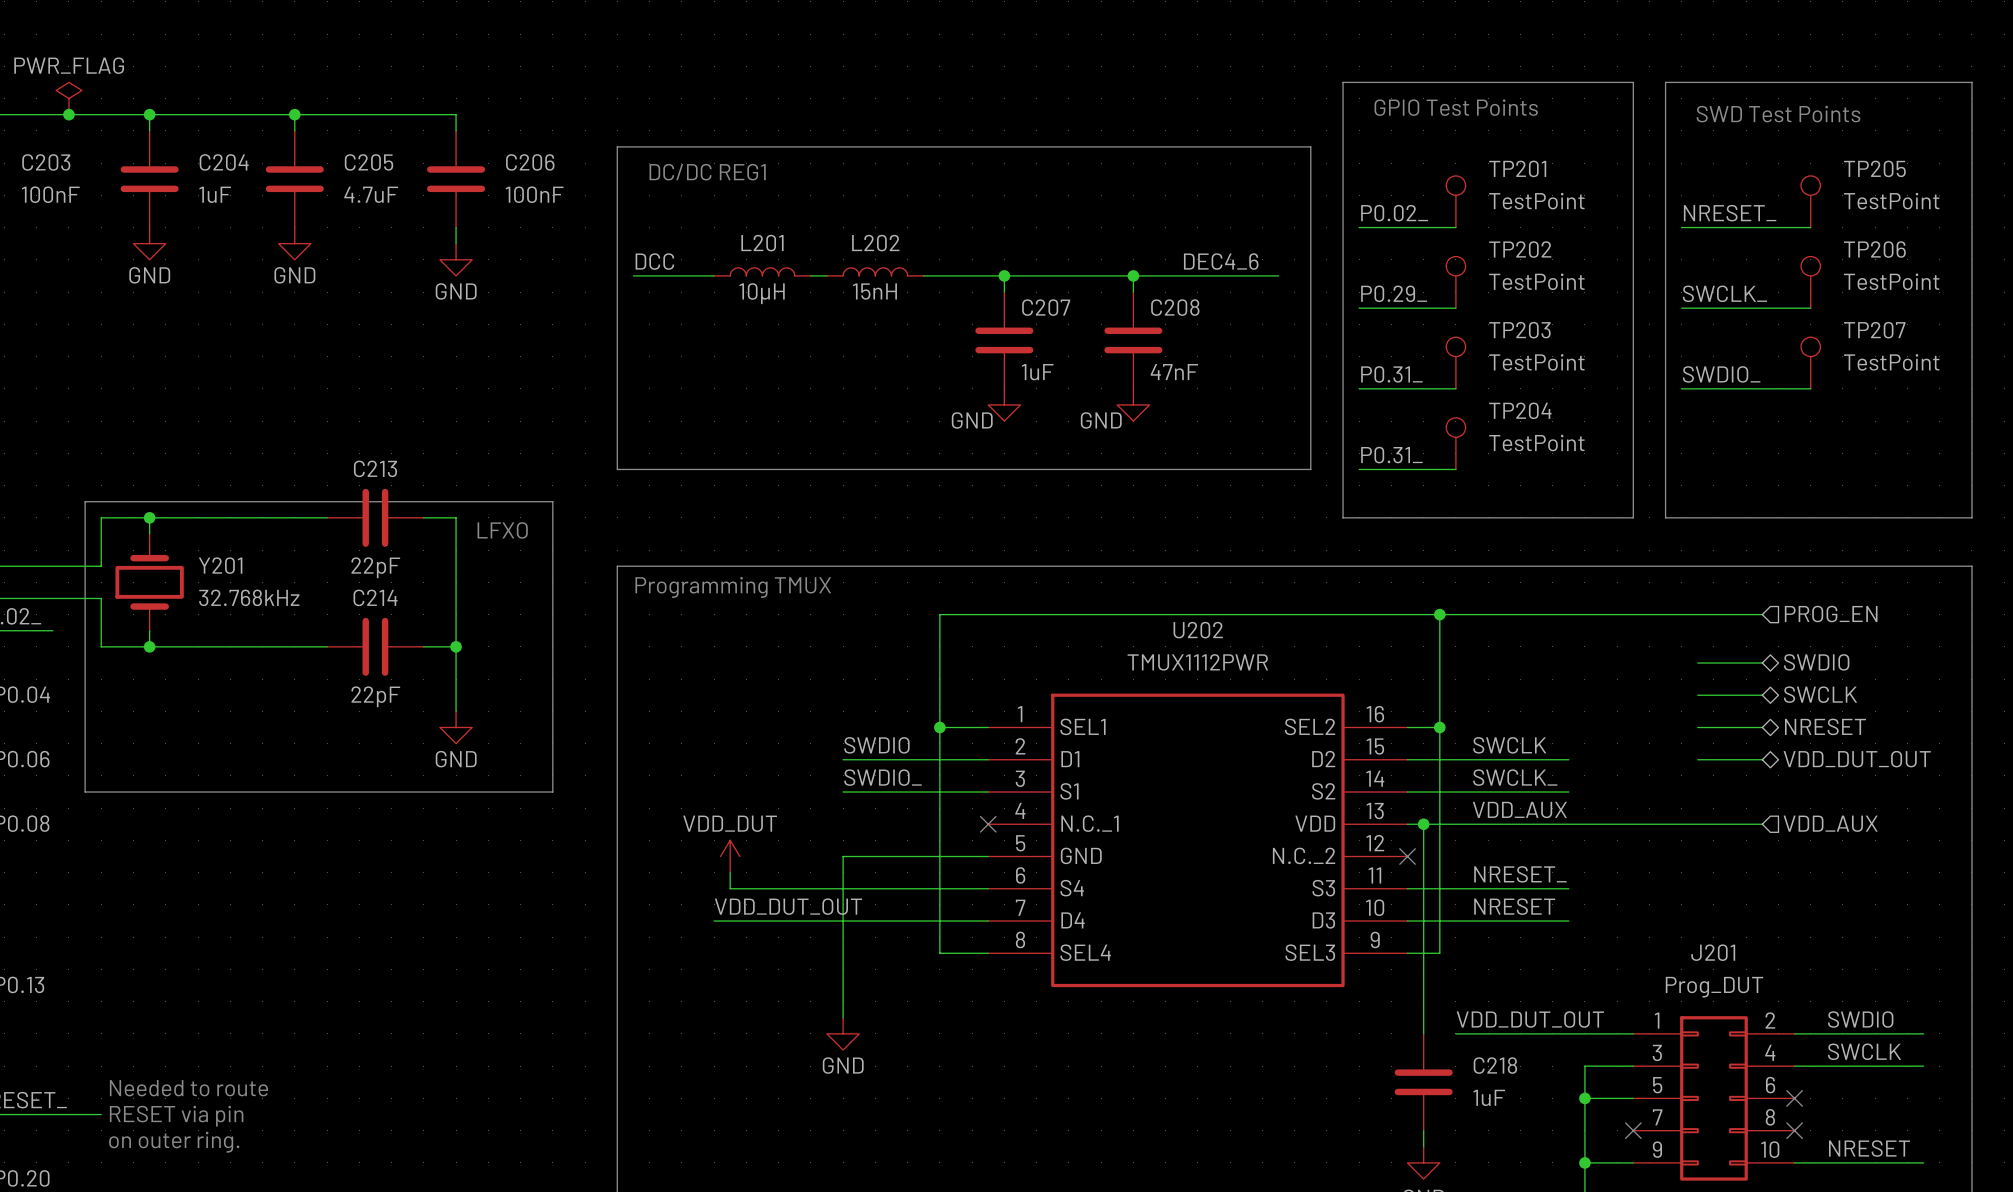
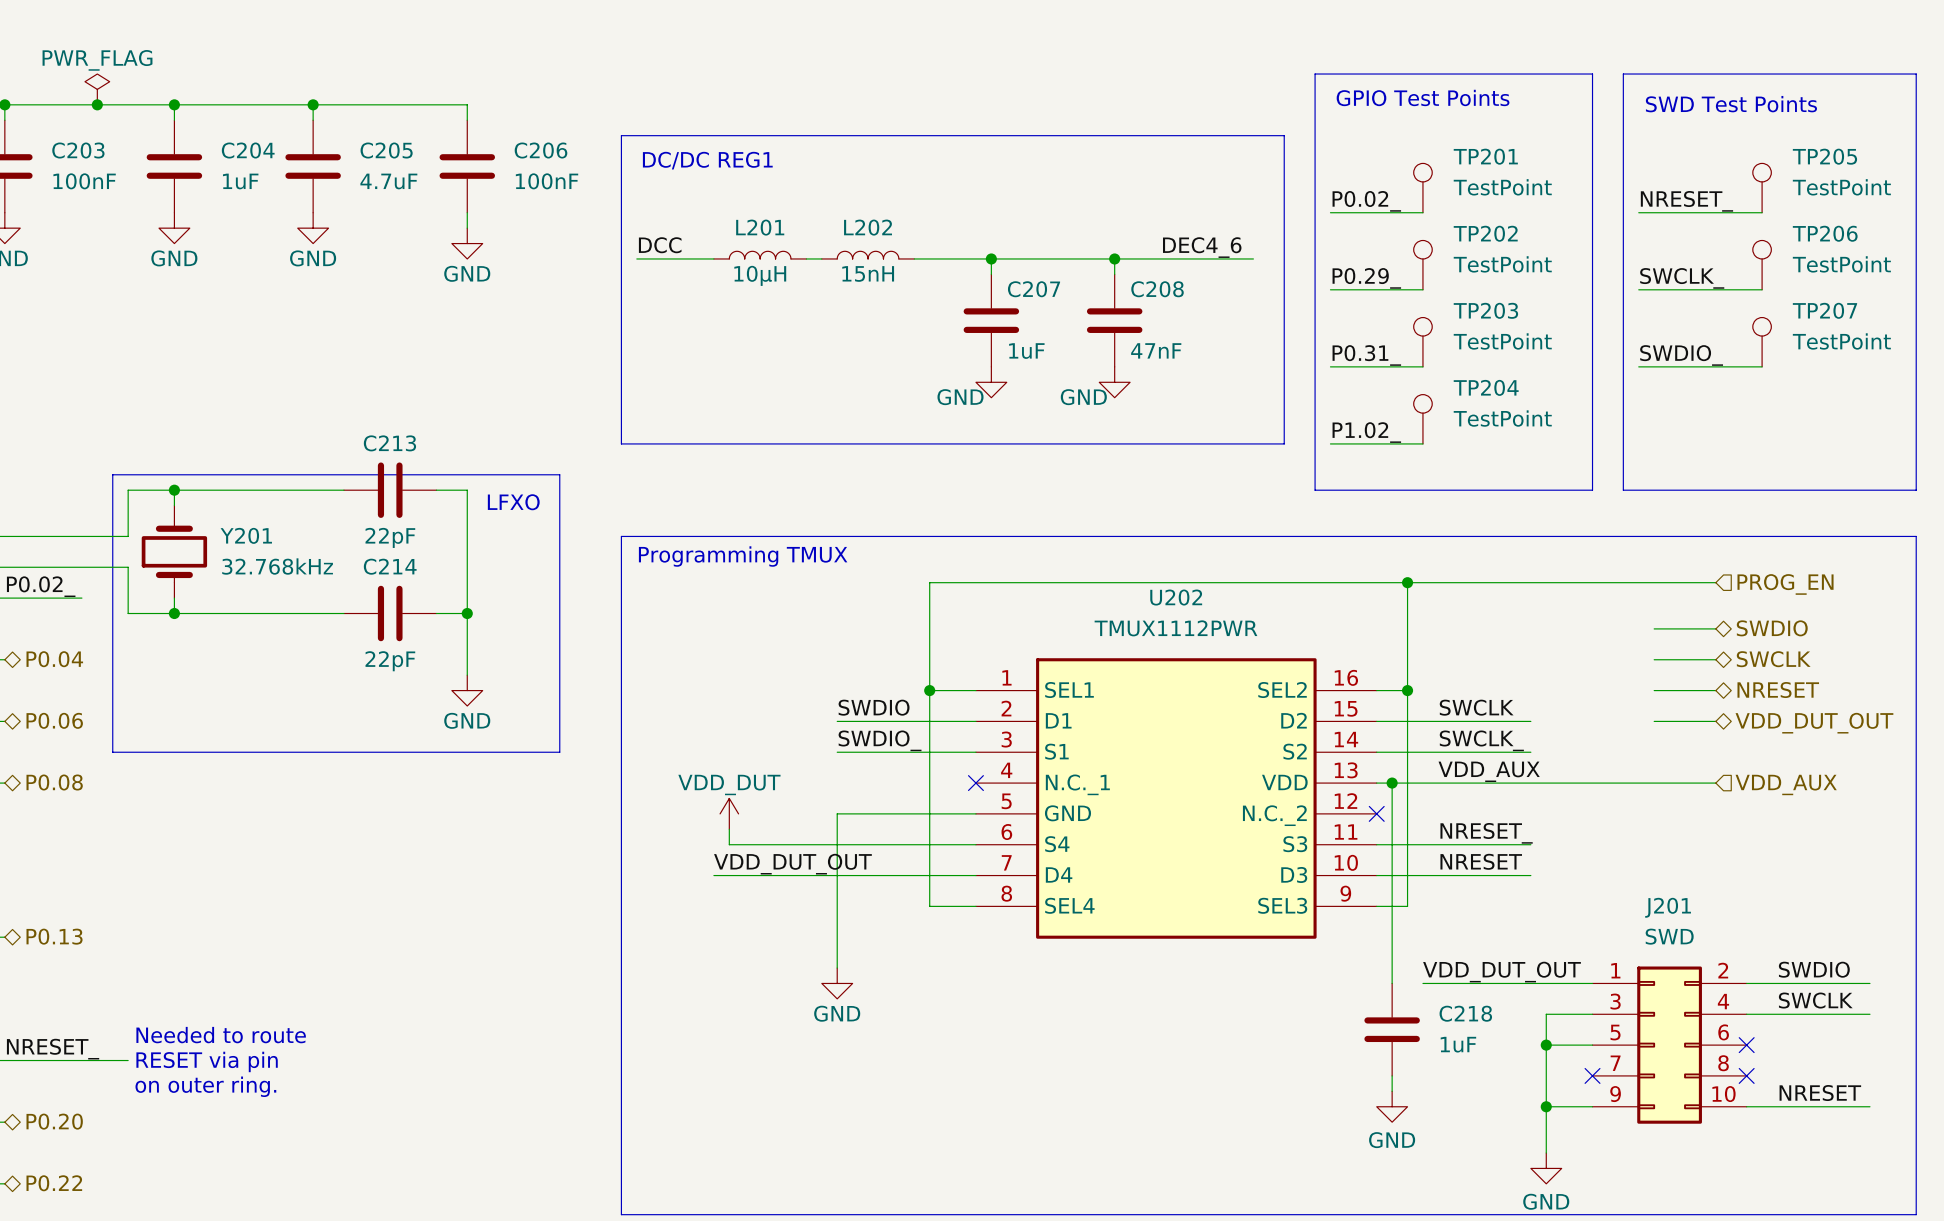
label: P0.31_ (1391, 455) -> P1.02_ (1366, 432)
J201 value: Prog_DUT (1714, 987) -> SWD (1669, 936)

